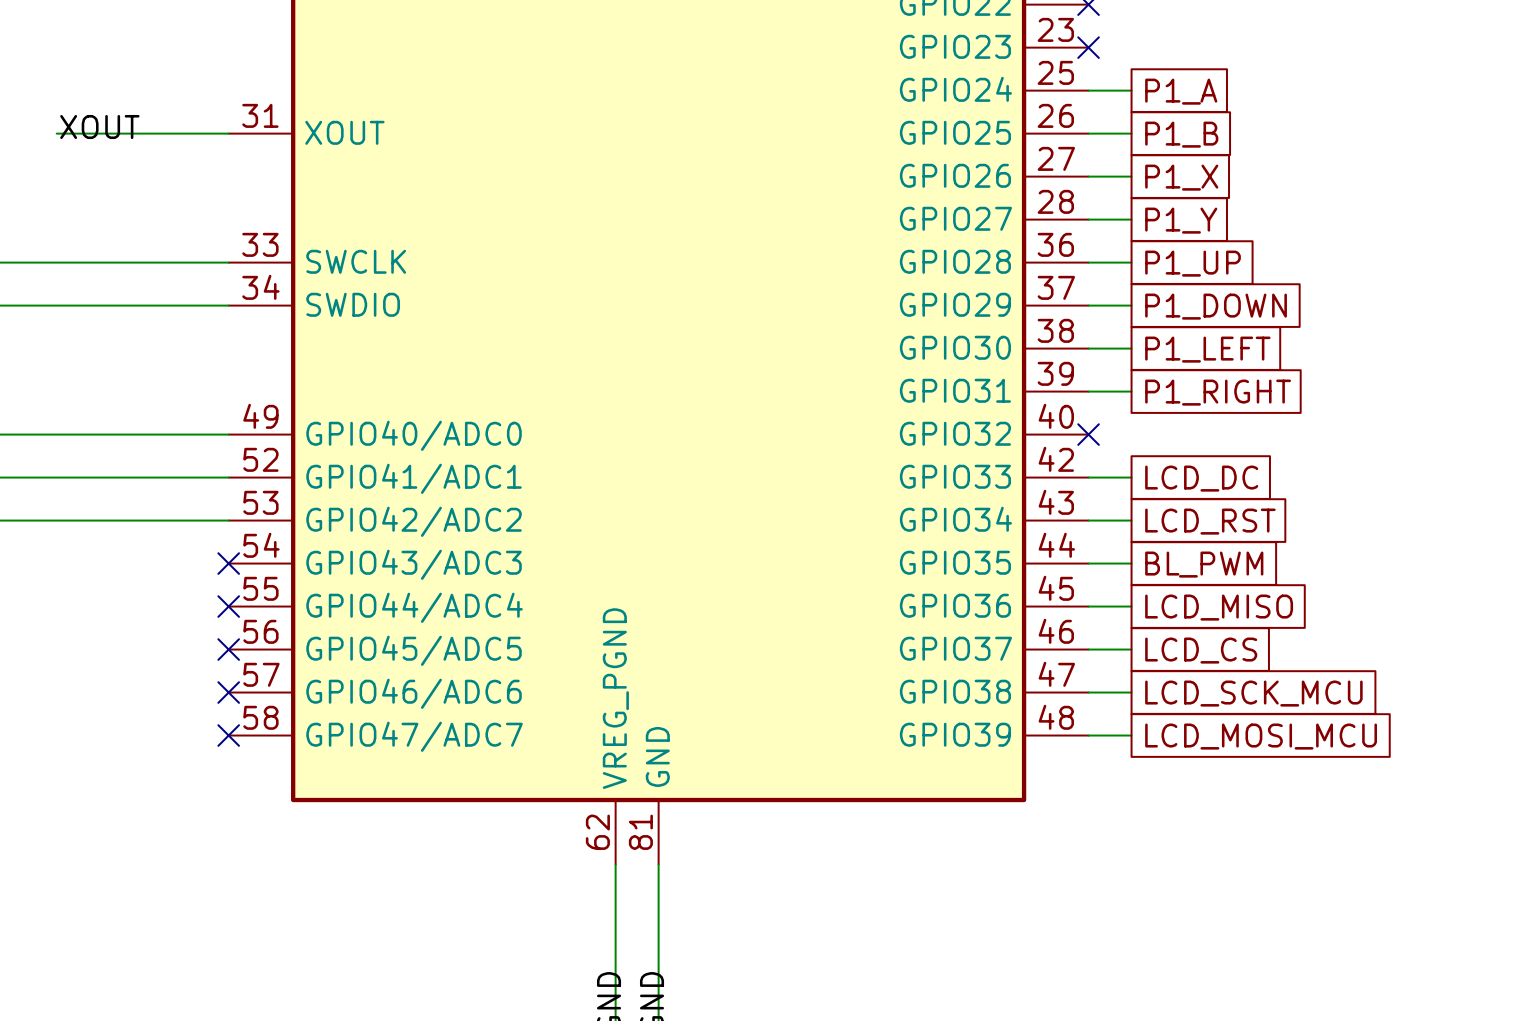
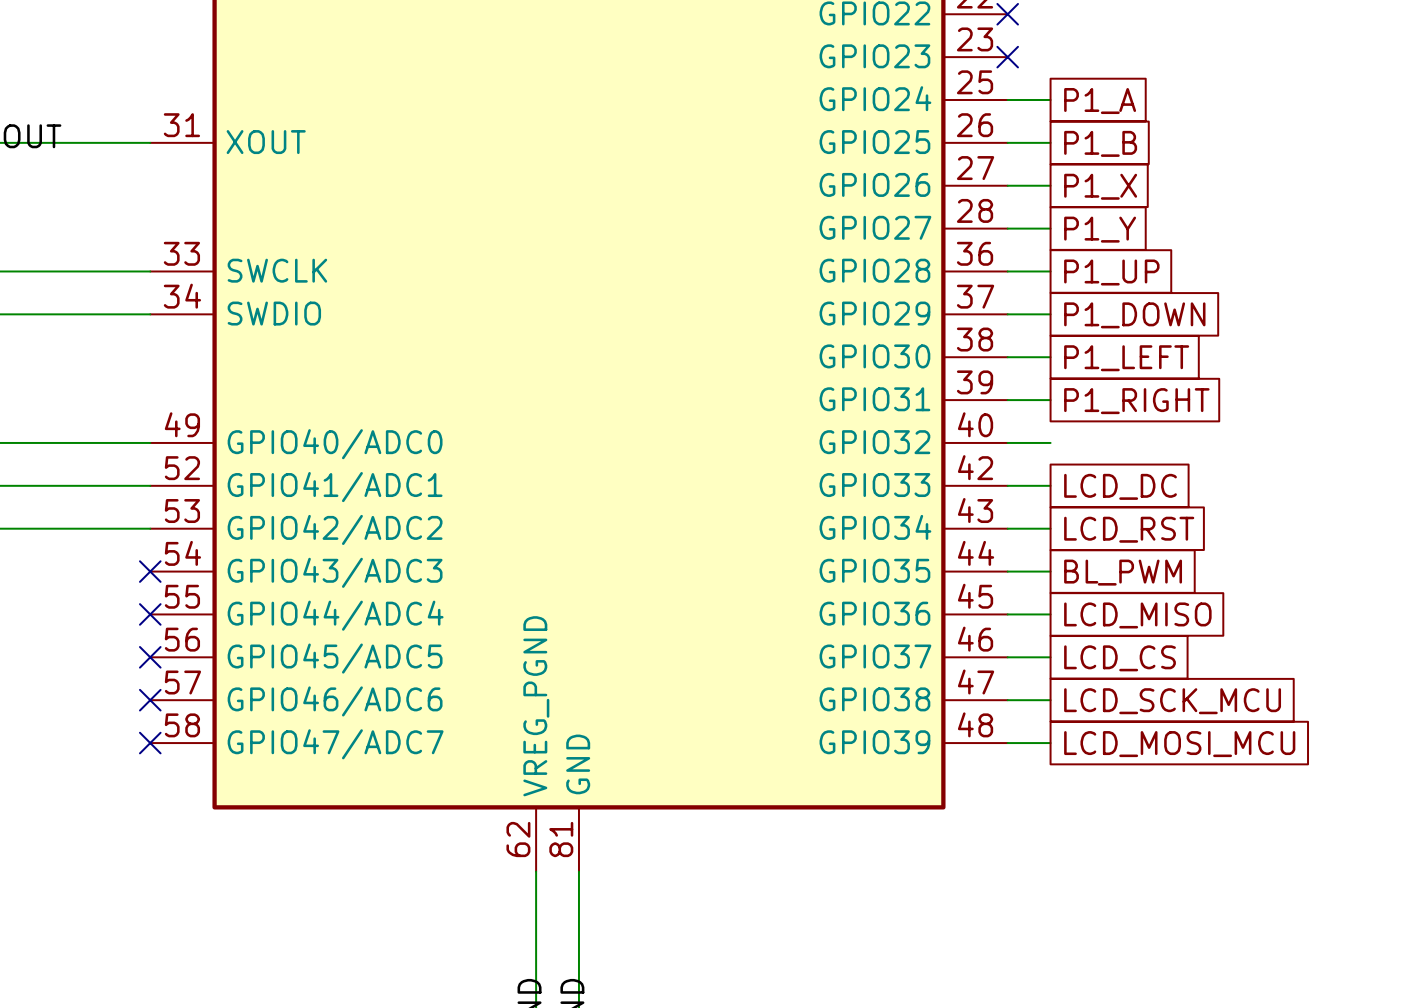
wire: none -> (1007, 442) (1050, 442)
no-connect mark: (1088, 434) -> none

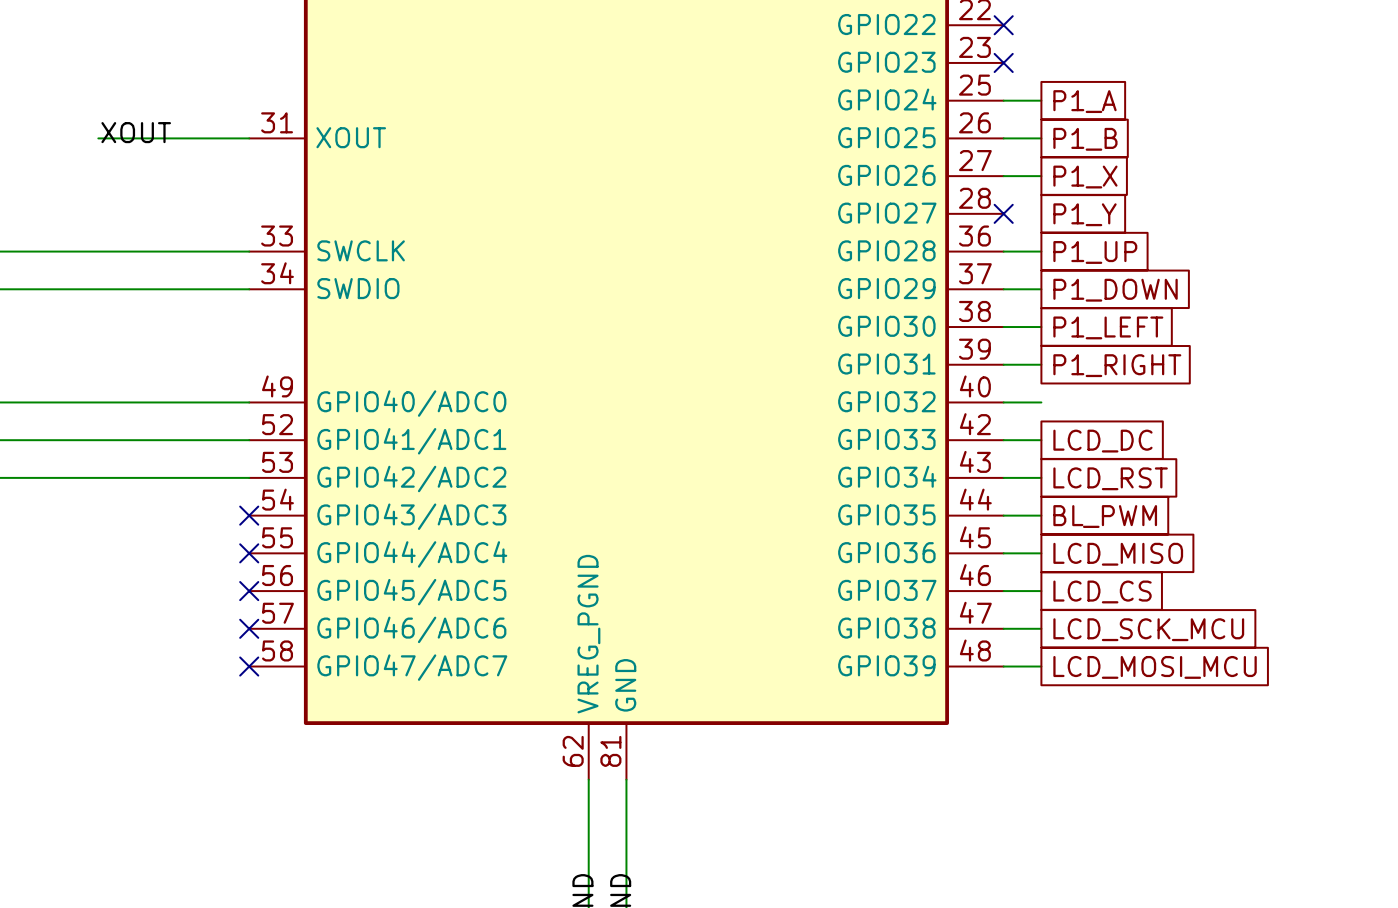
wire: (1007, 228) (1050, 228) -> none
no-connect mark: none -> (1003, 213)

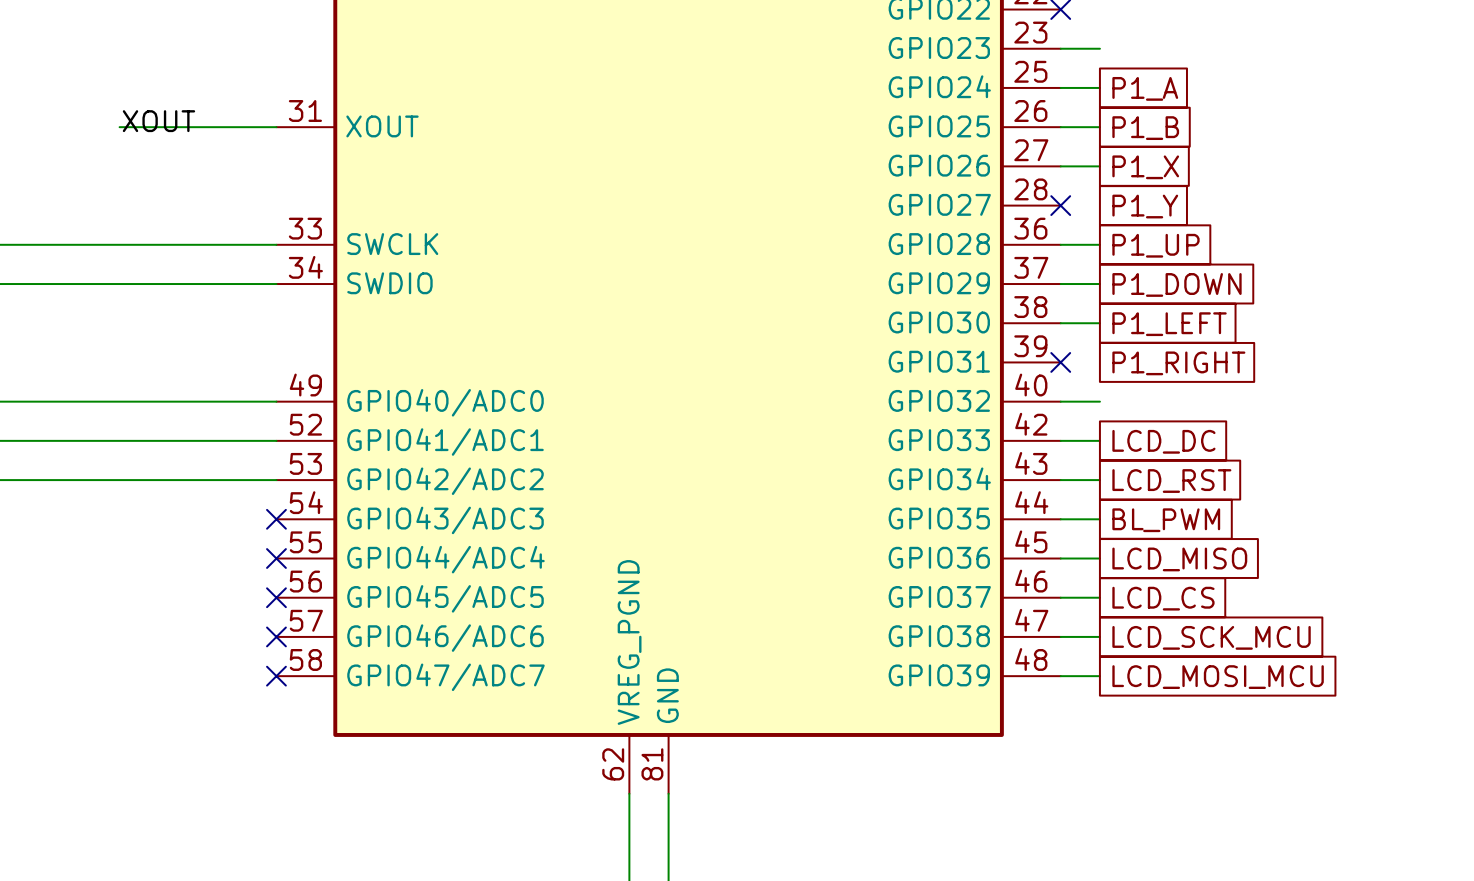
no-connect mark: (1003, 62) -> none
wire: (1003, 364) (1041, 364) -> (1060, 48) (1099, 48)
no-connect mark: none -> (1060, 362)

